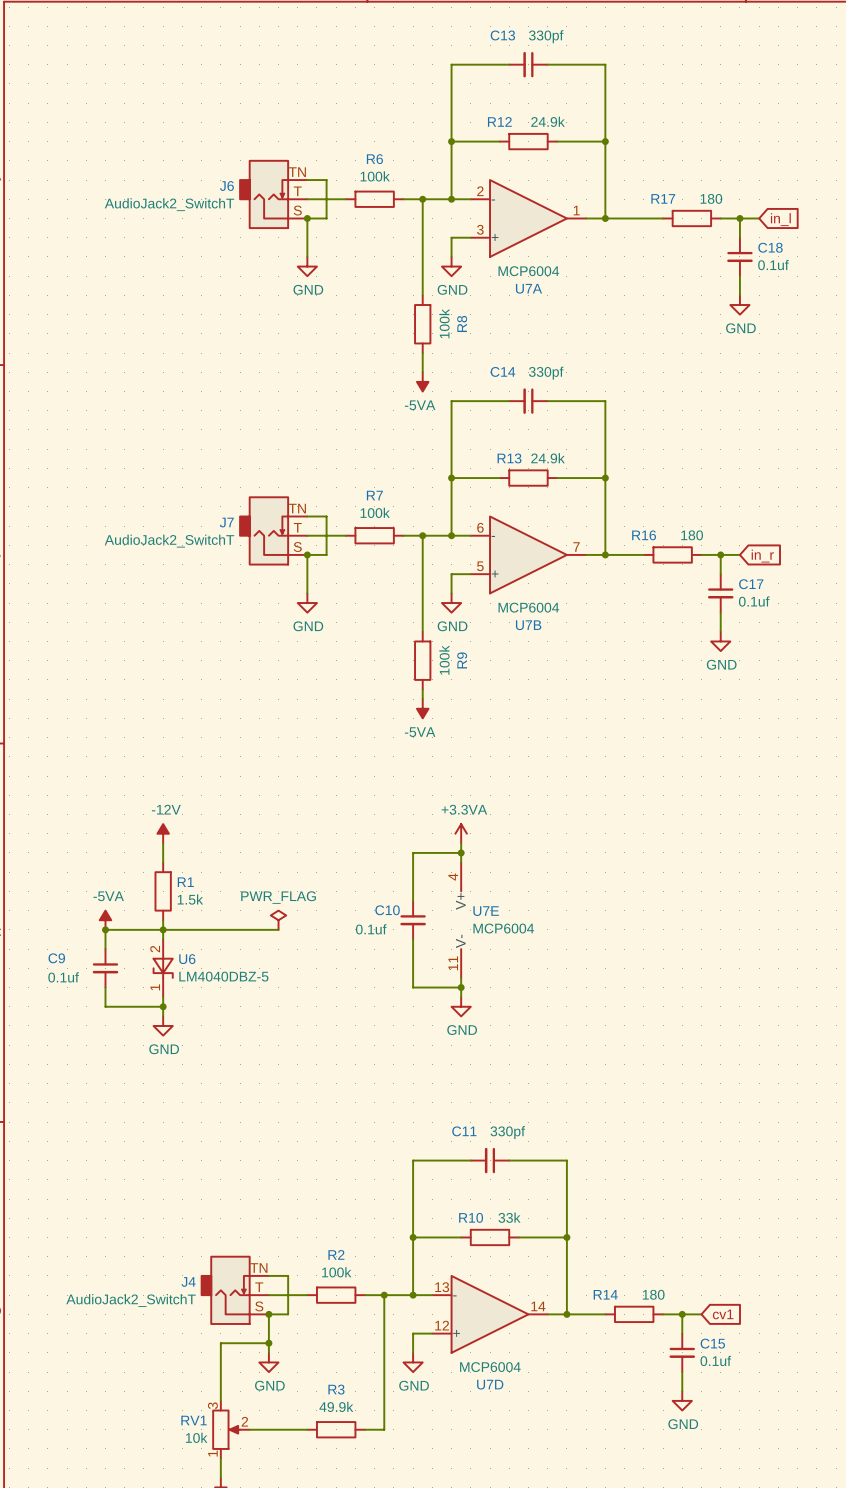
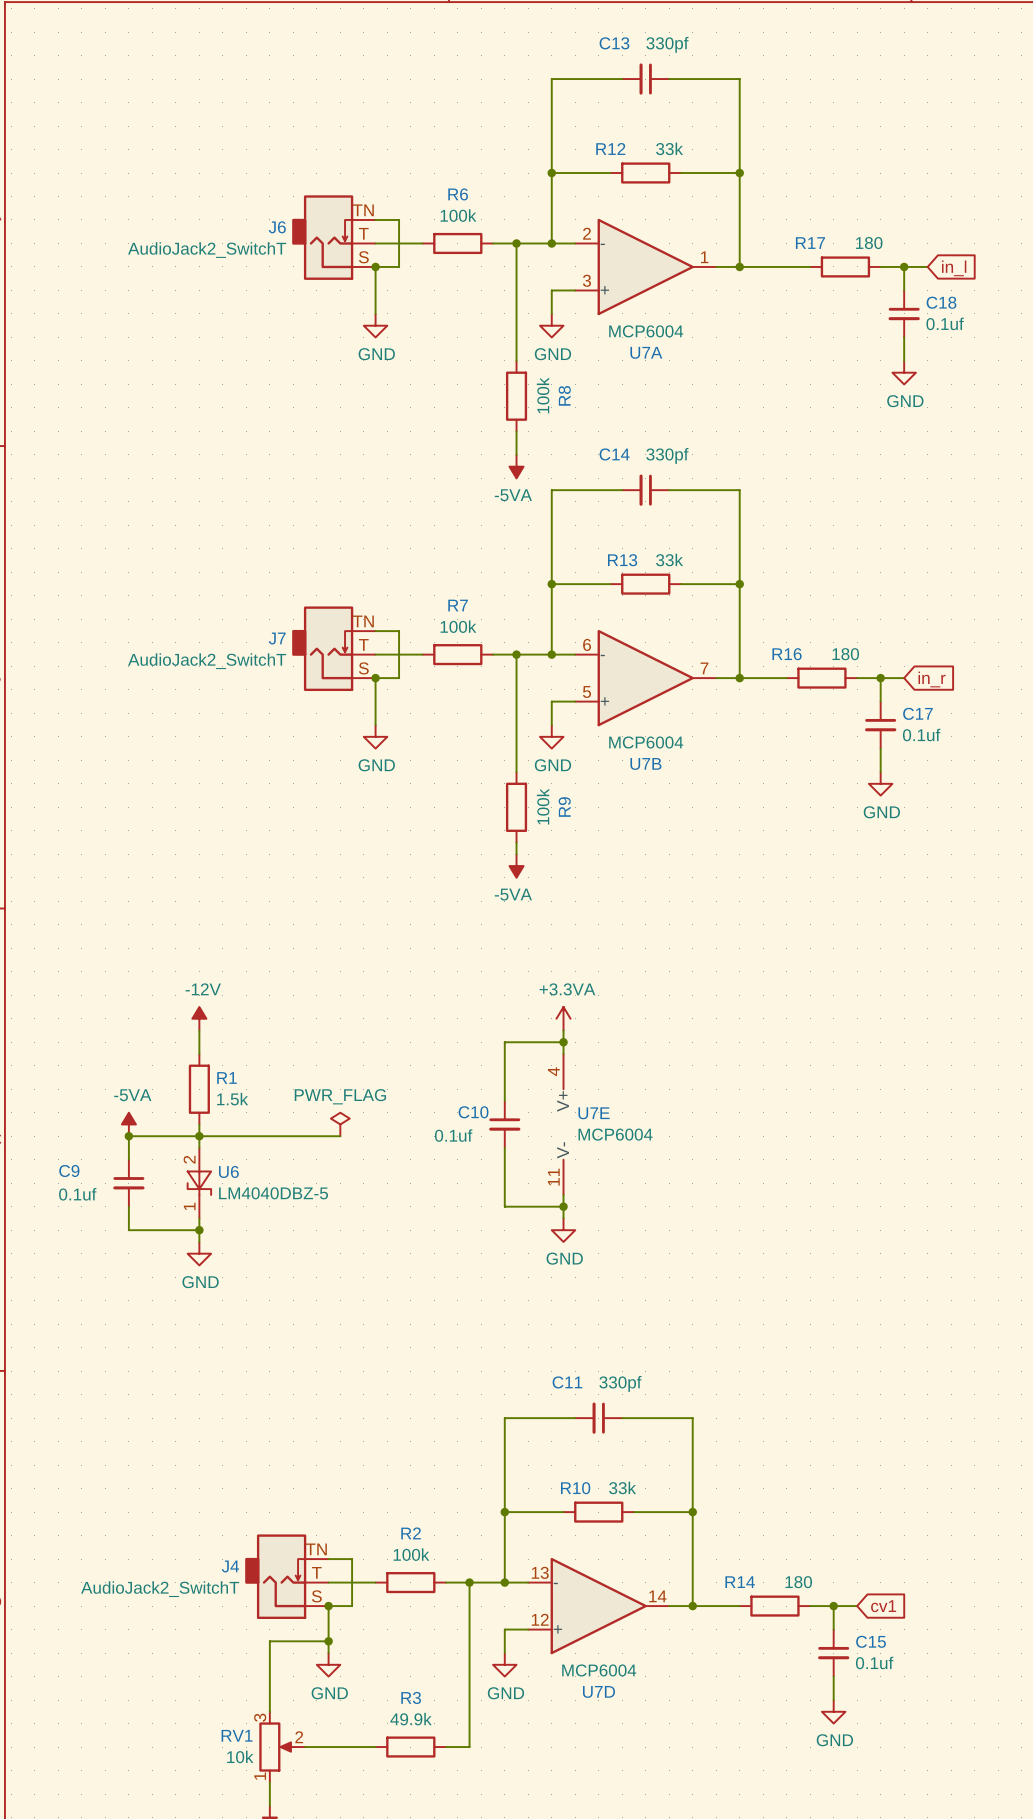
R12 value: 24.9k (548, 121) -> 33k (669, 148)
R13 value: 24.9k (548, 458) -> 33k (669, 559)

